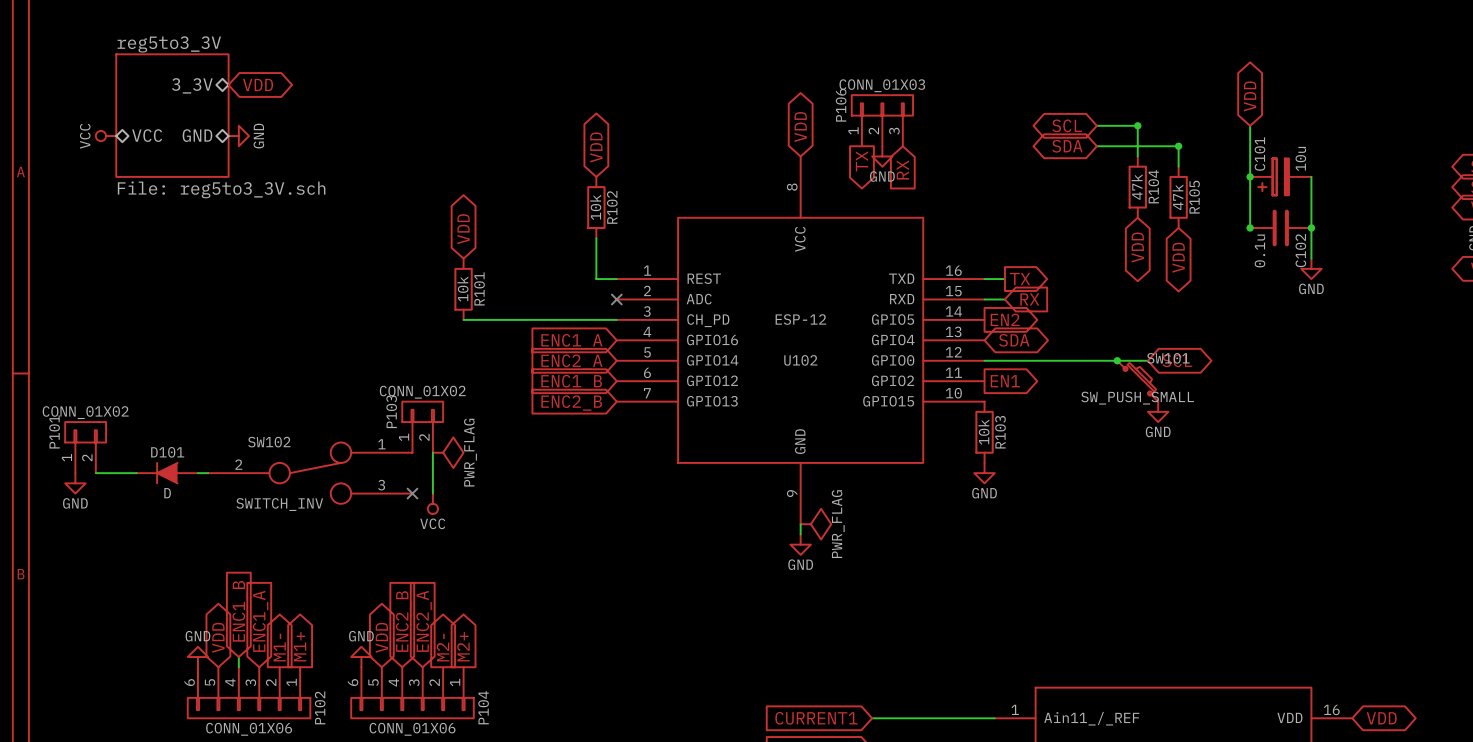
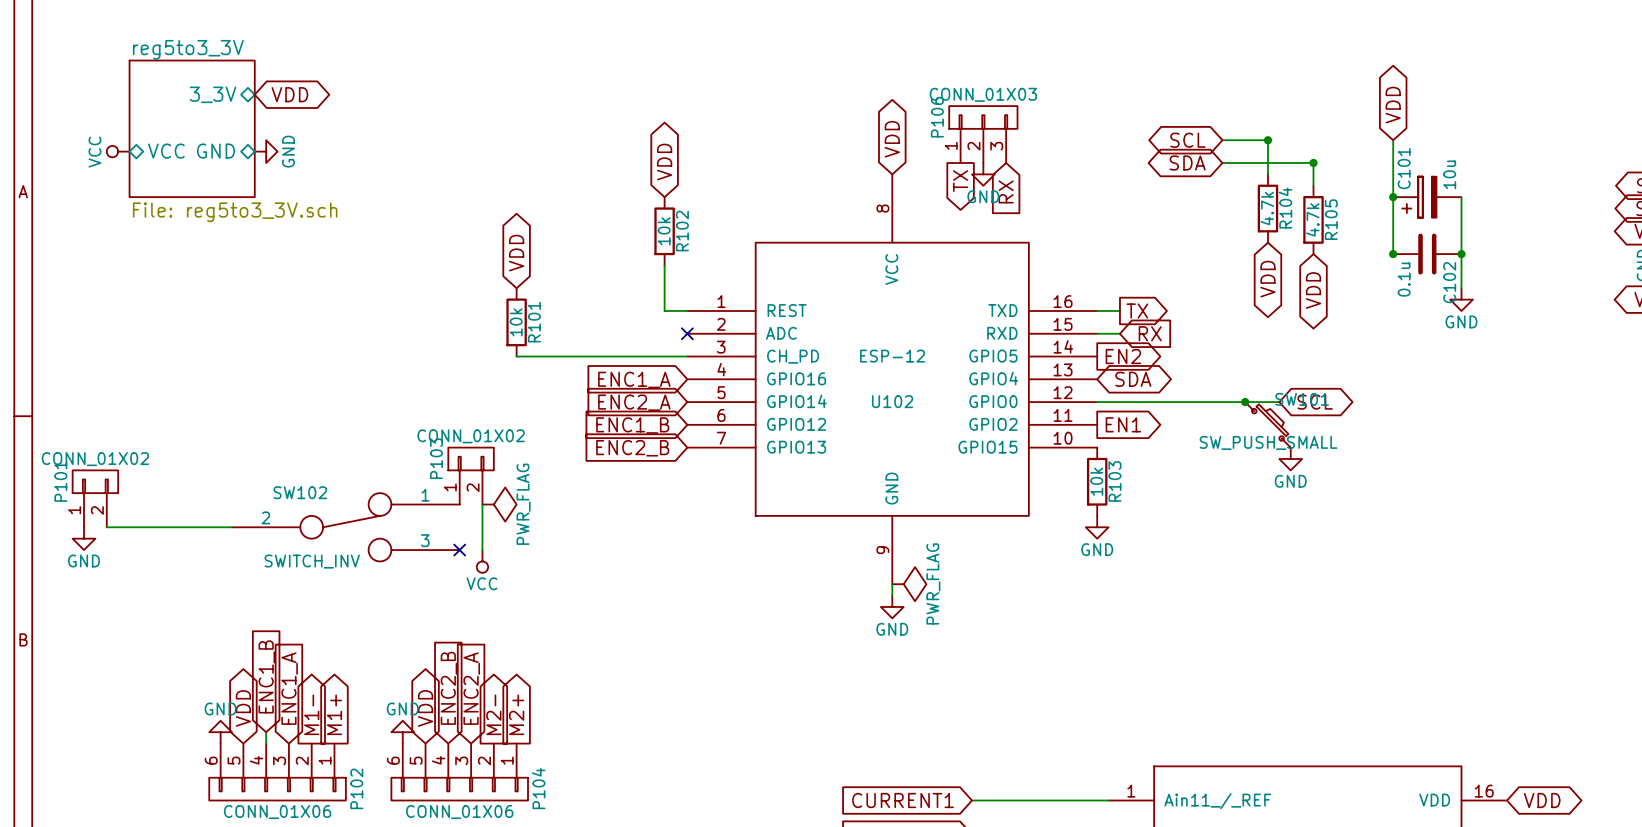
R104 value: 47k (1137, 187) -> 4.7k (1267, 208)
R105 value: 47k (1177, 197) -> 4.7k (1312, 219)
D101: D (167, 473) -> none

